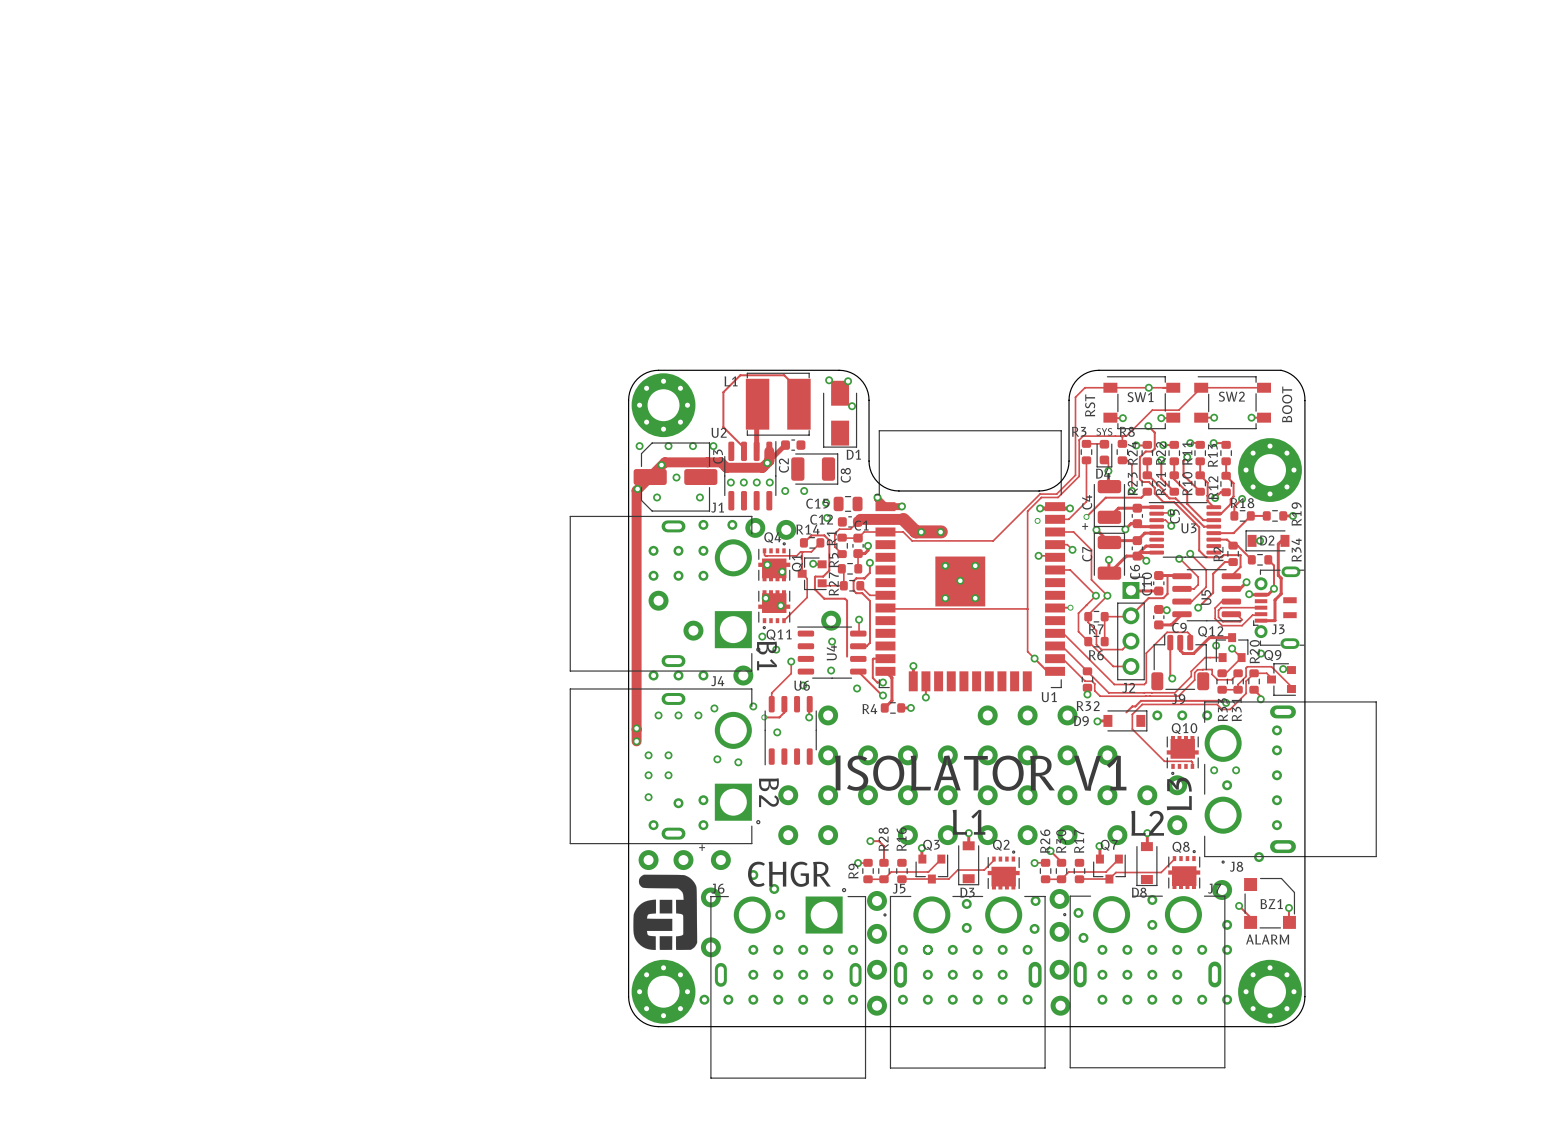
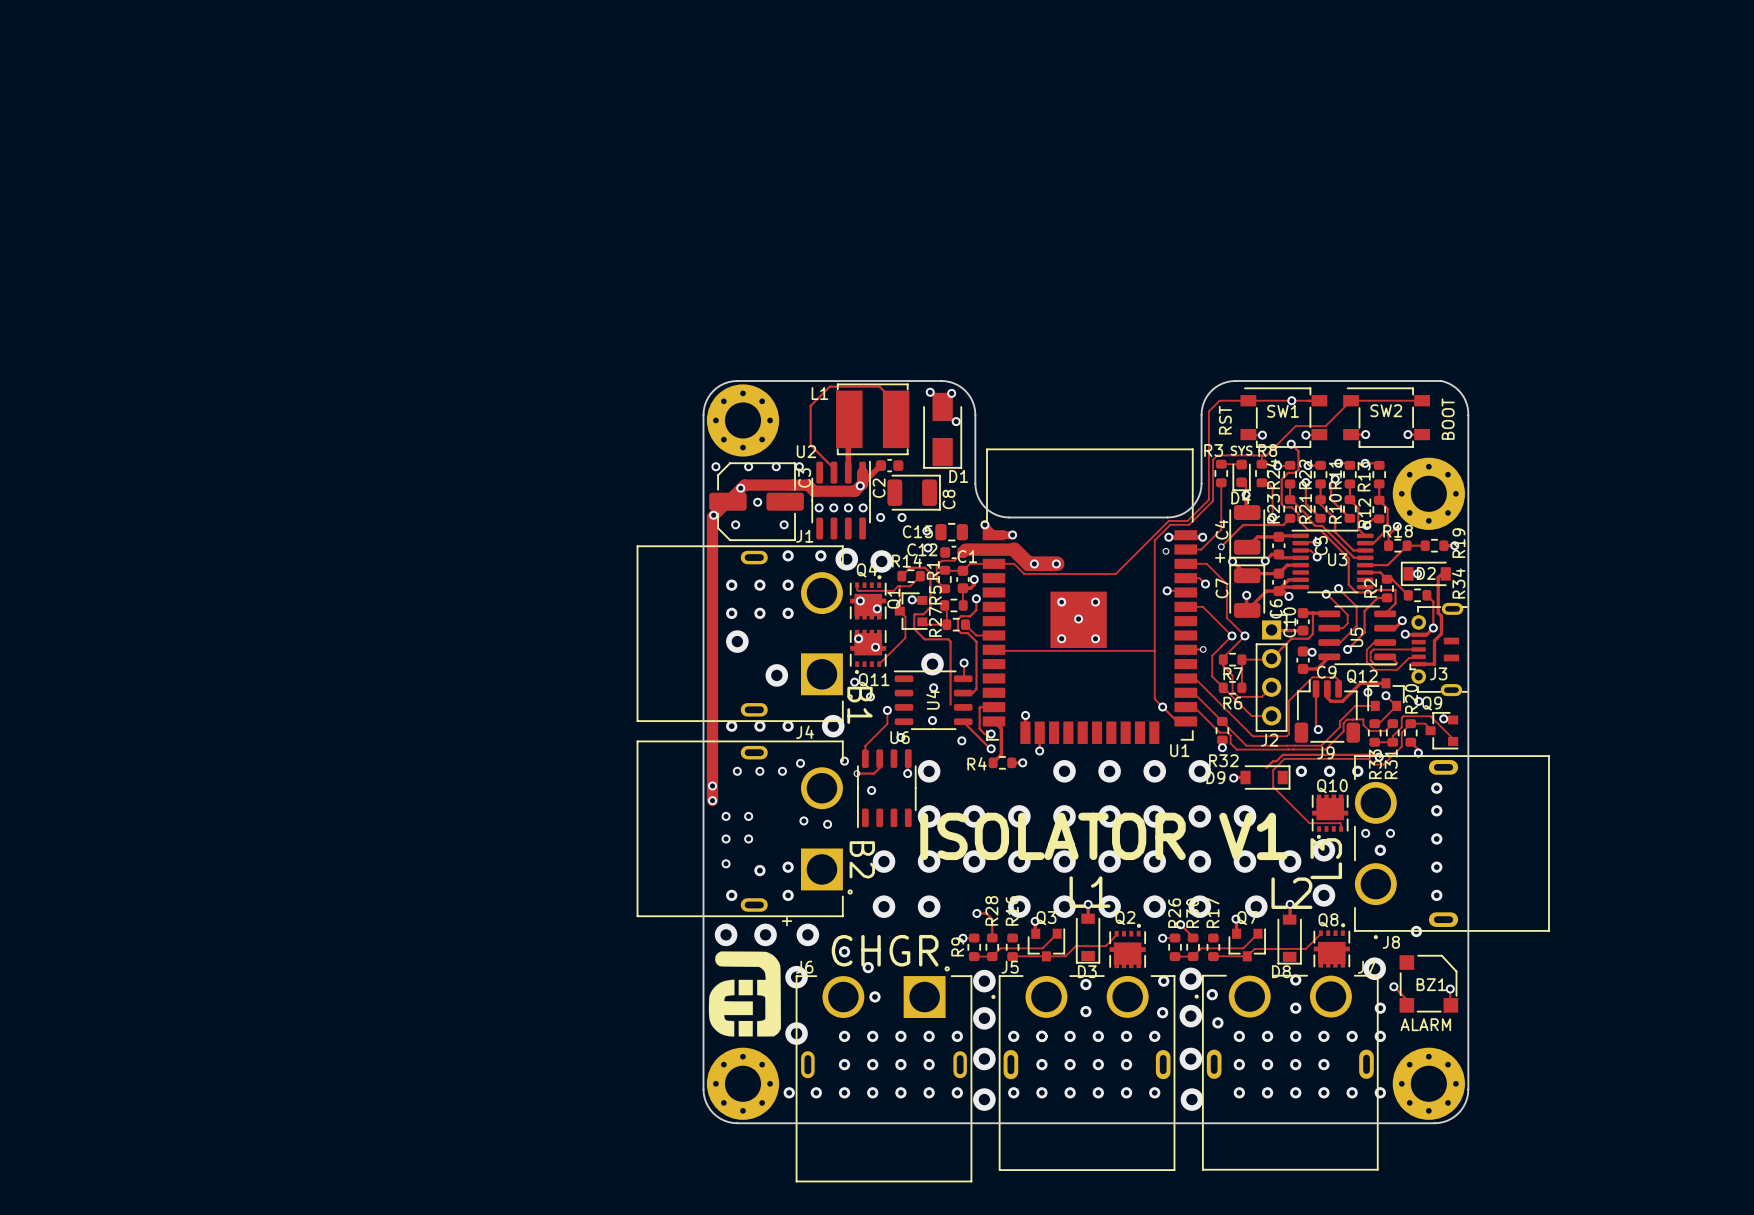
via: none -> (1064, 771)

